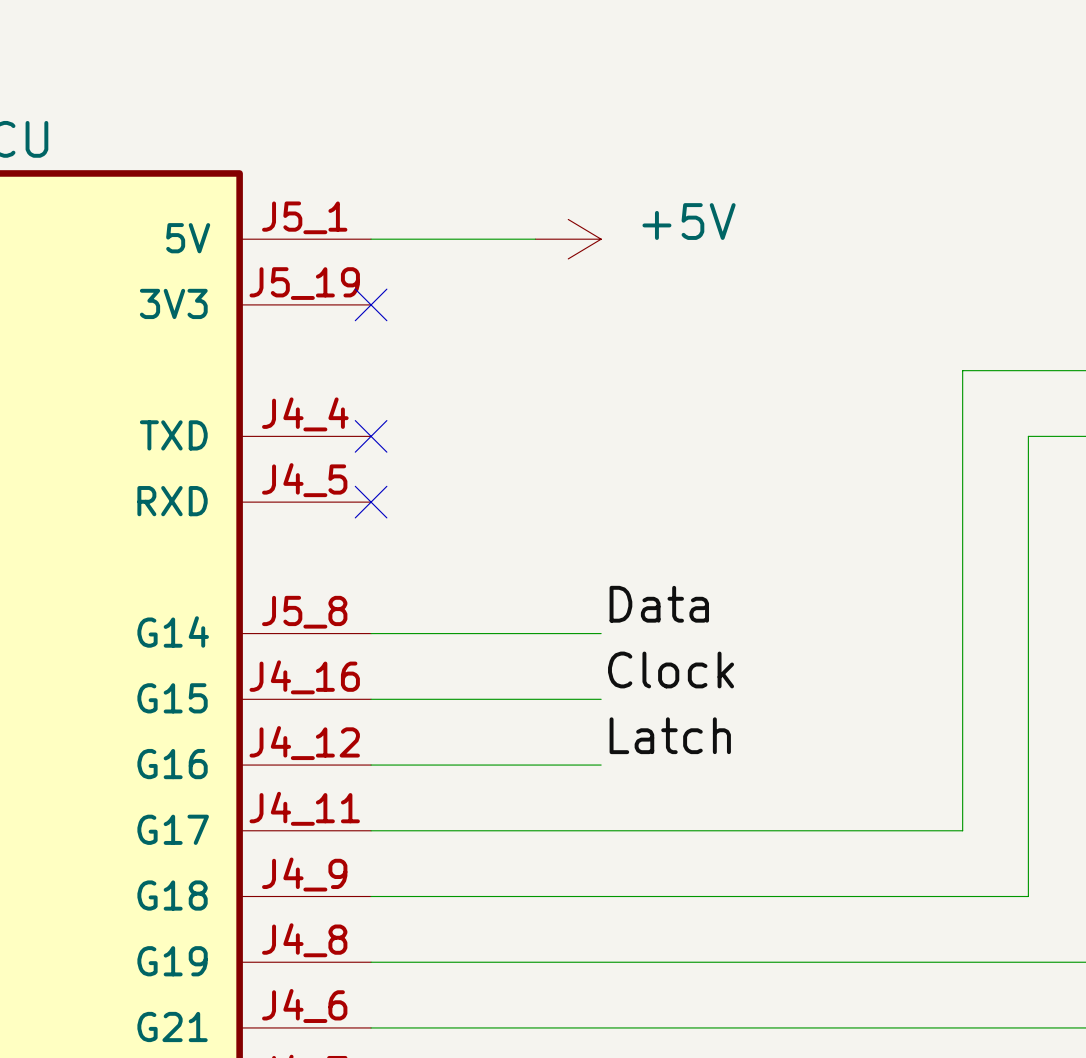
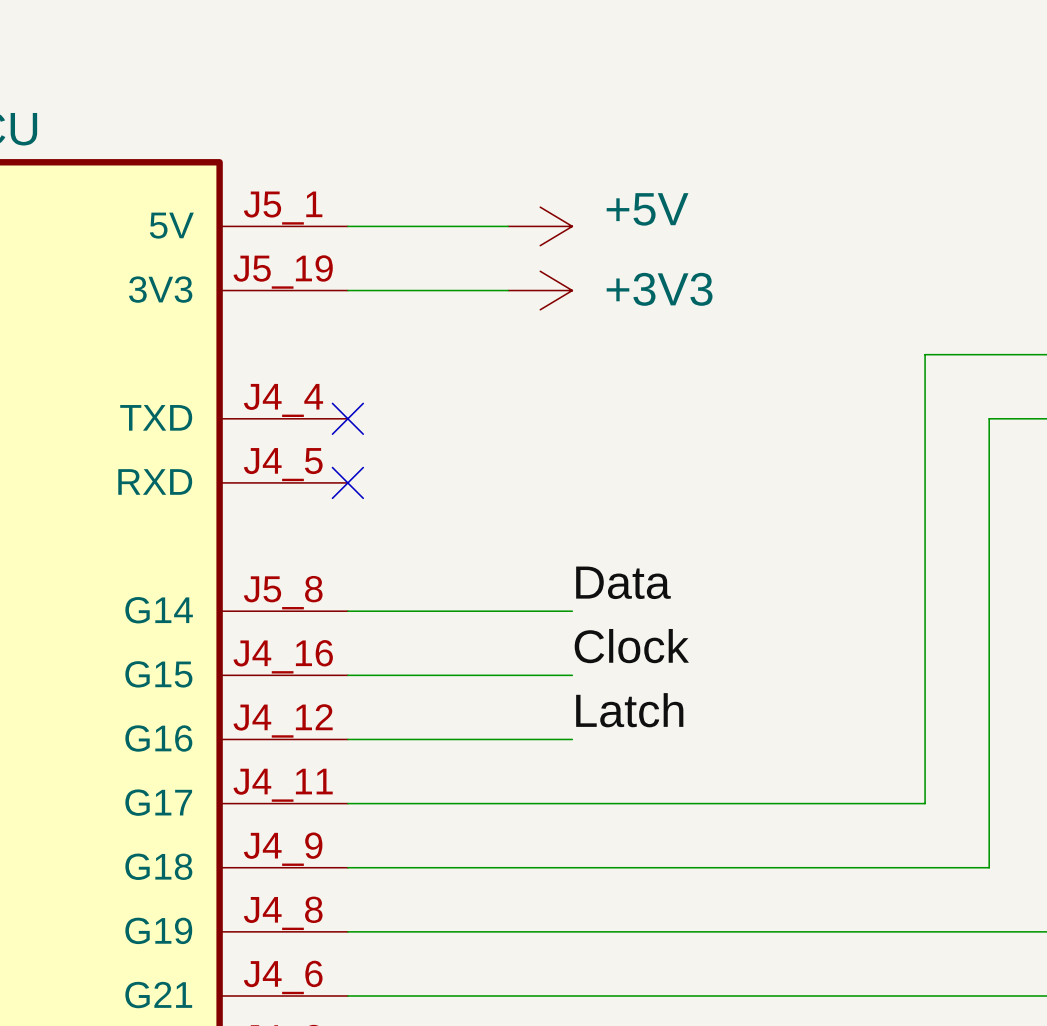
wire: none -> (347, 290) (508, 290)
no-connect mark: (371, 304) -> none
power symbol: none -> +3V3 (540, 290)

